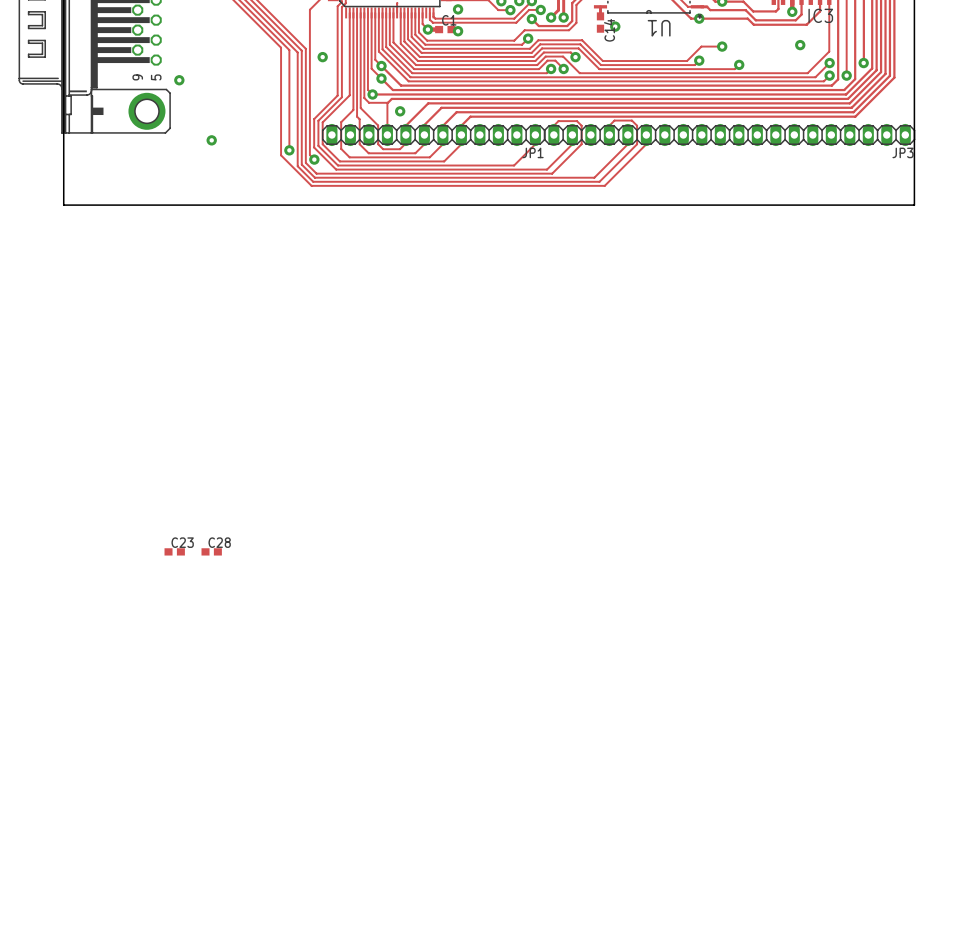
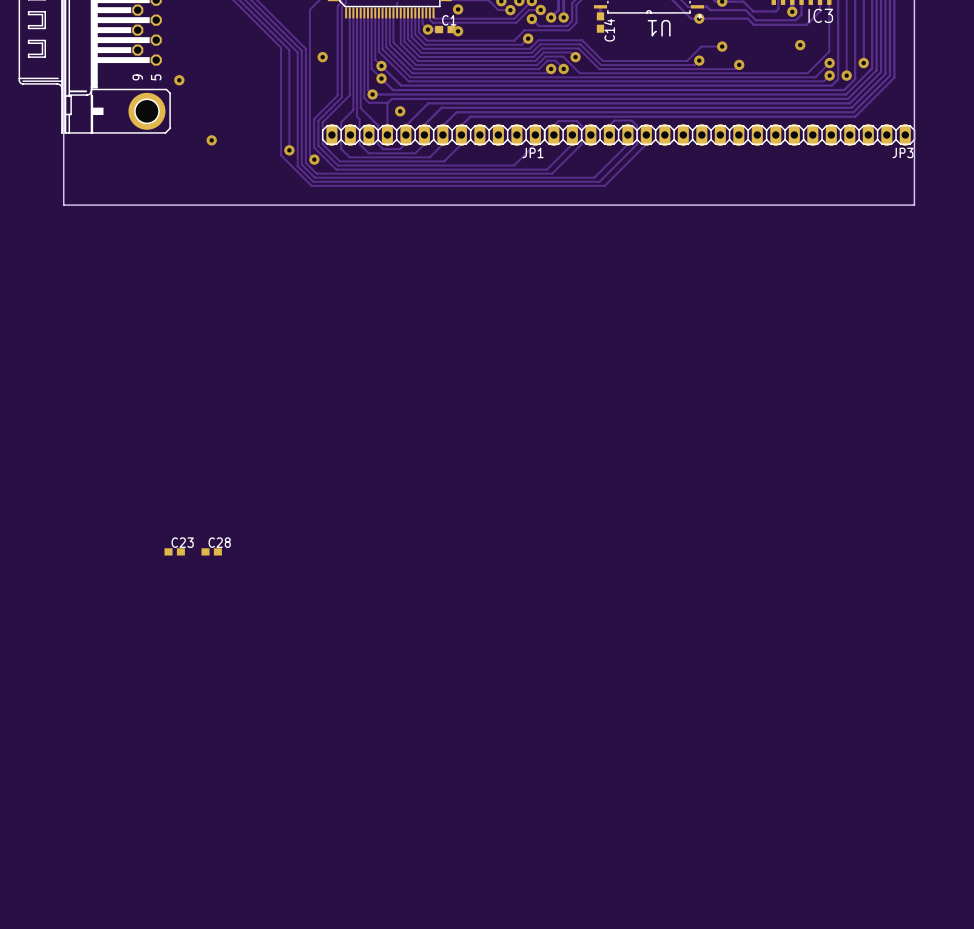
via: (615, 26) -> none

